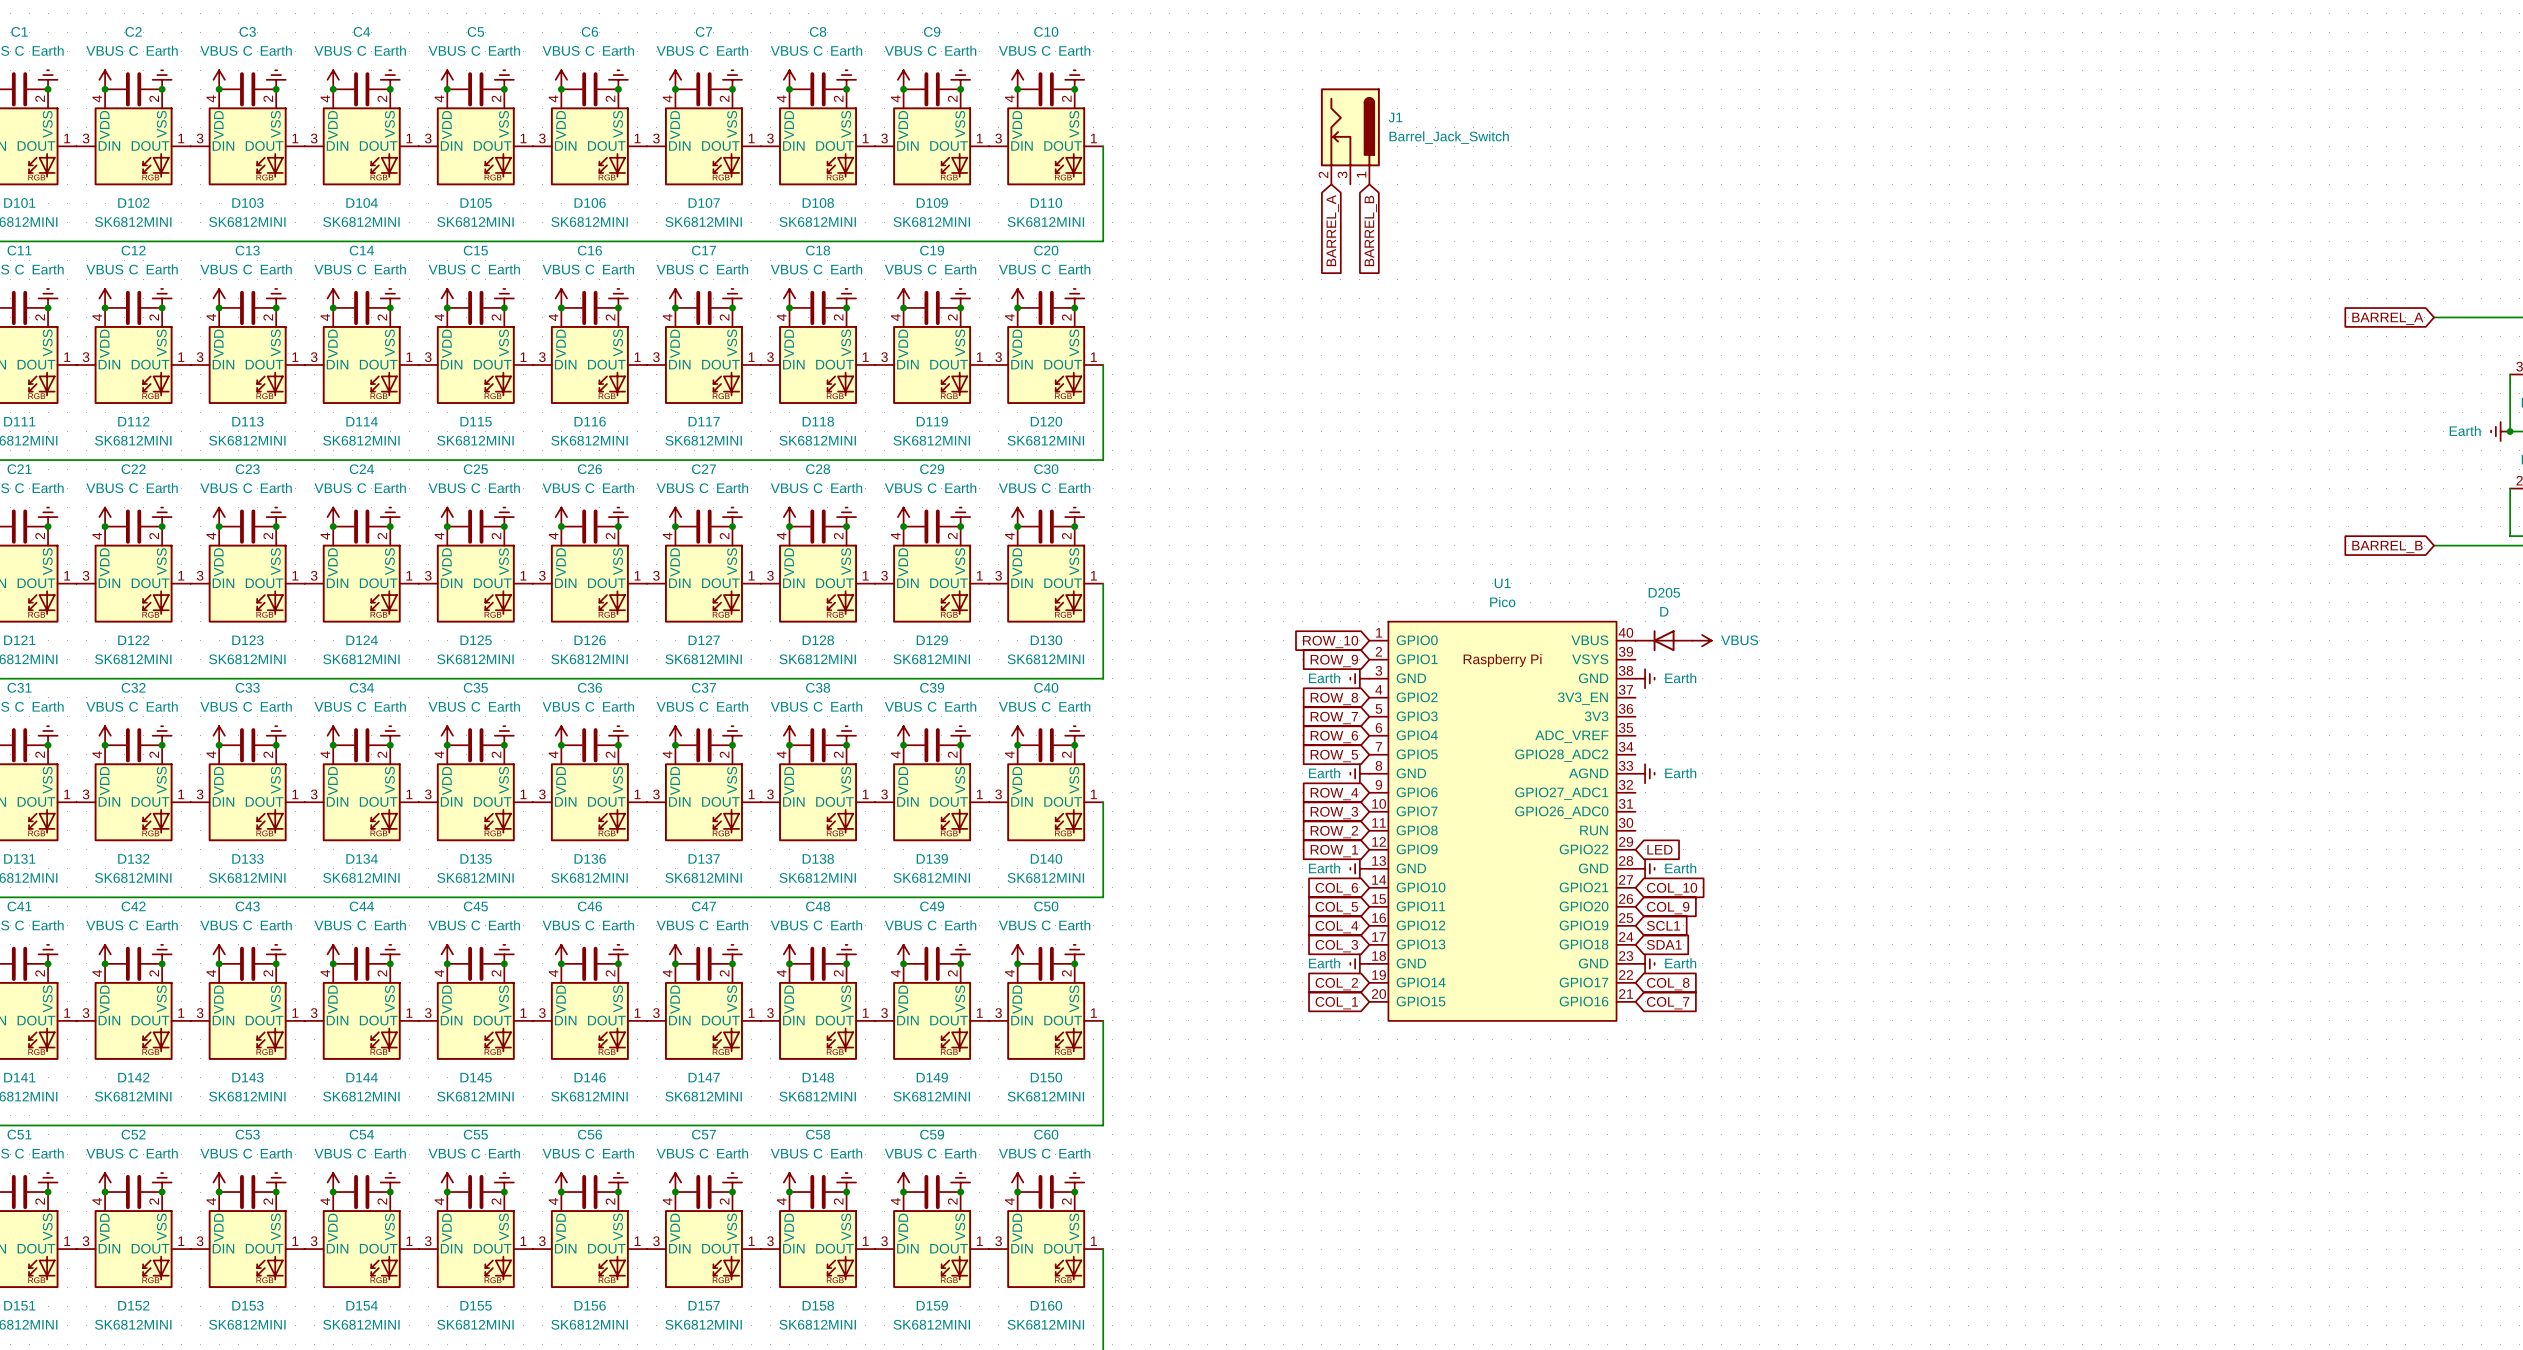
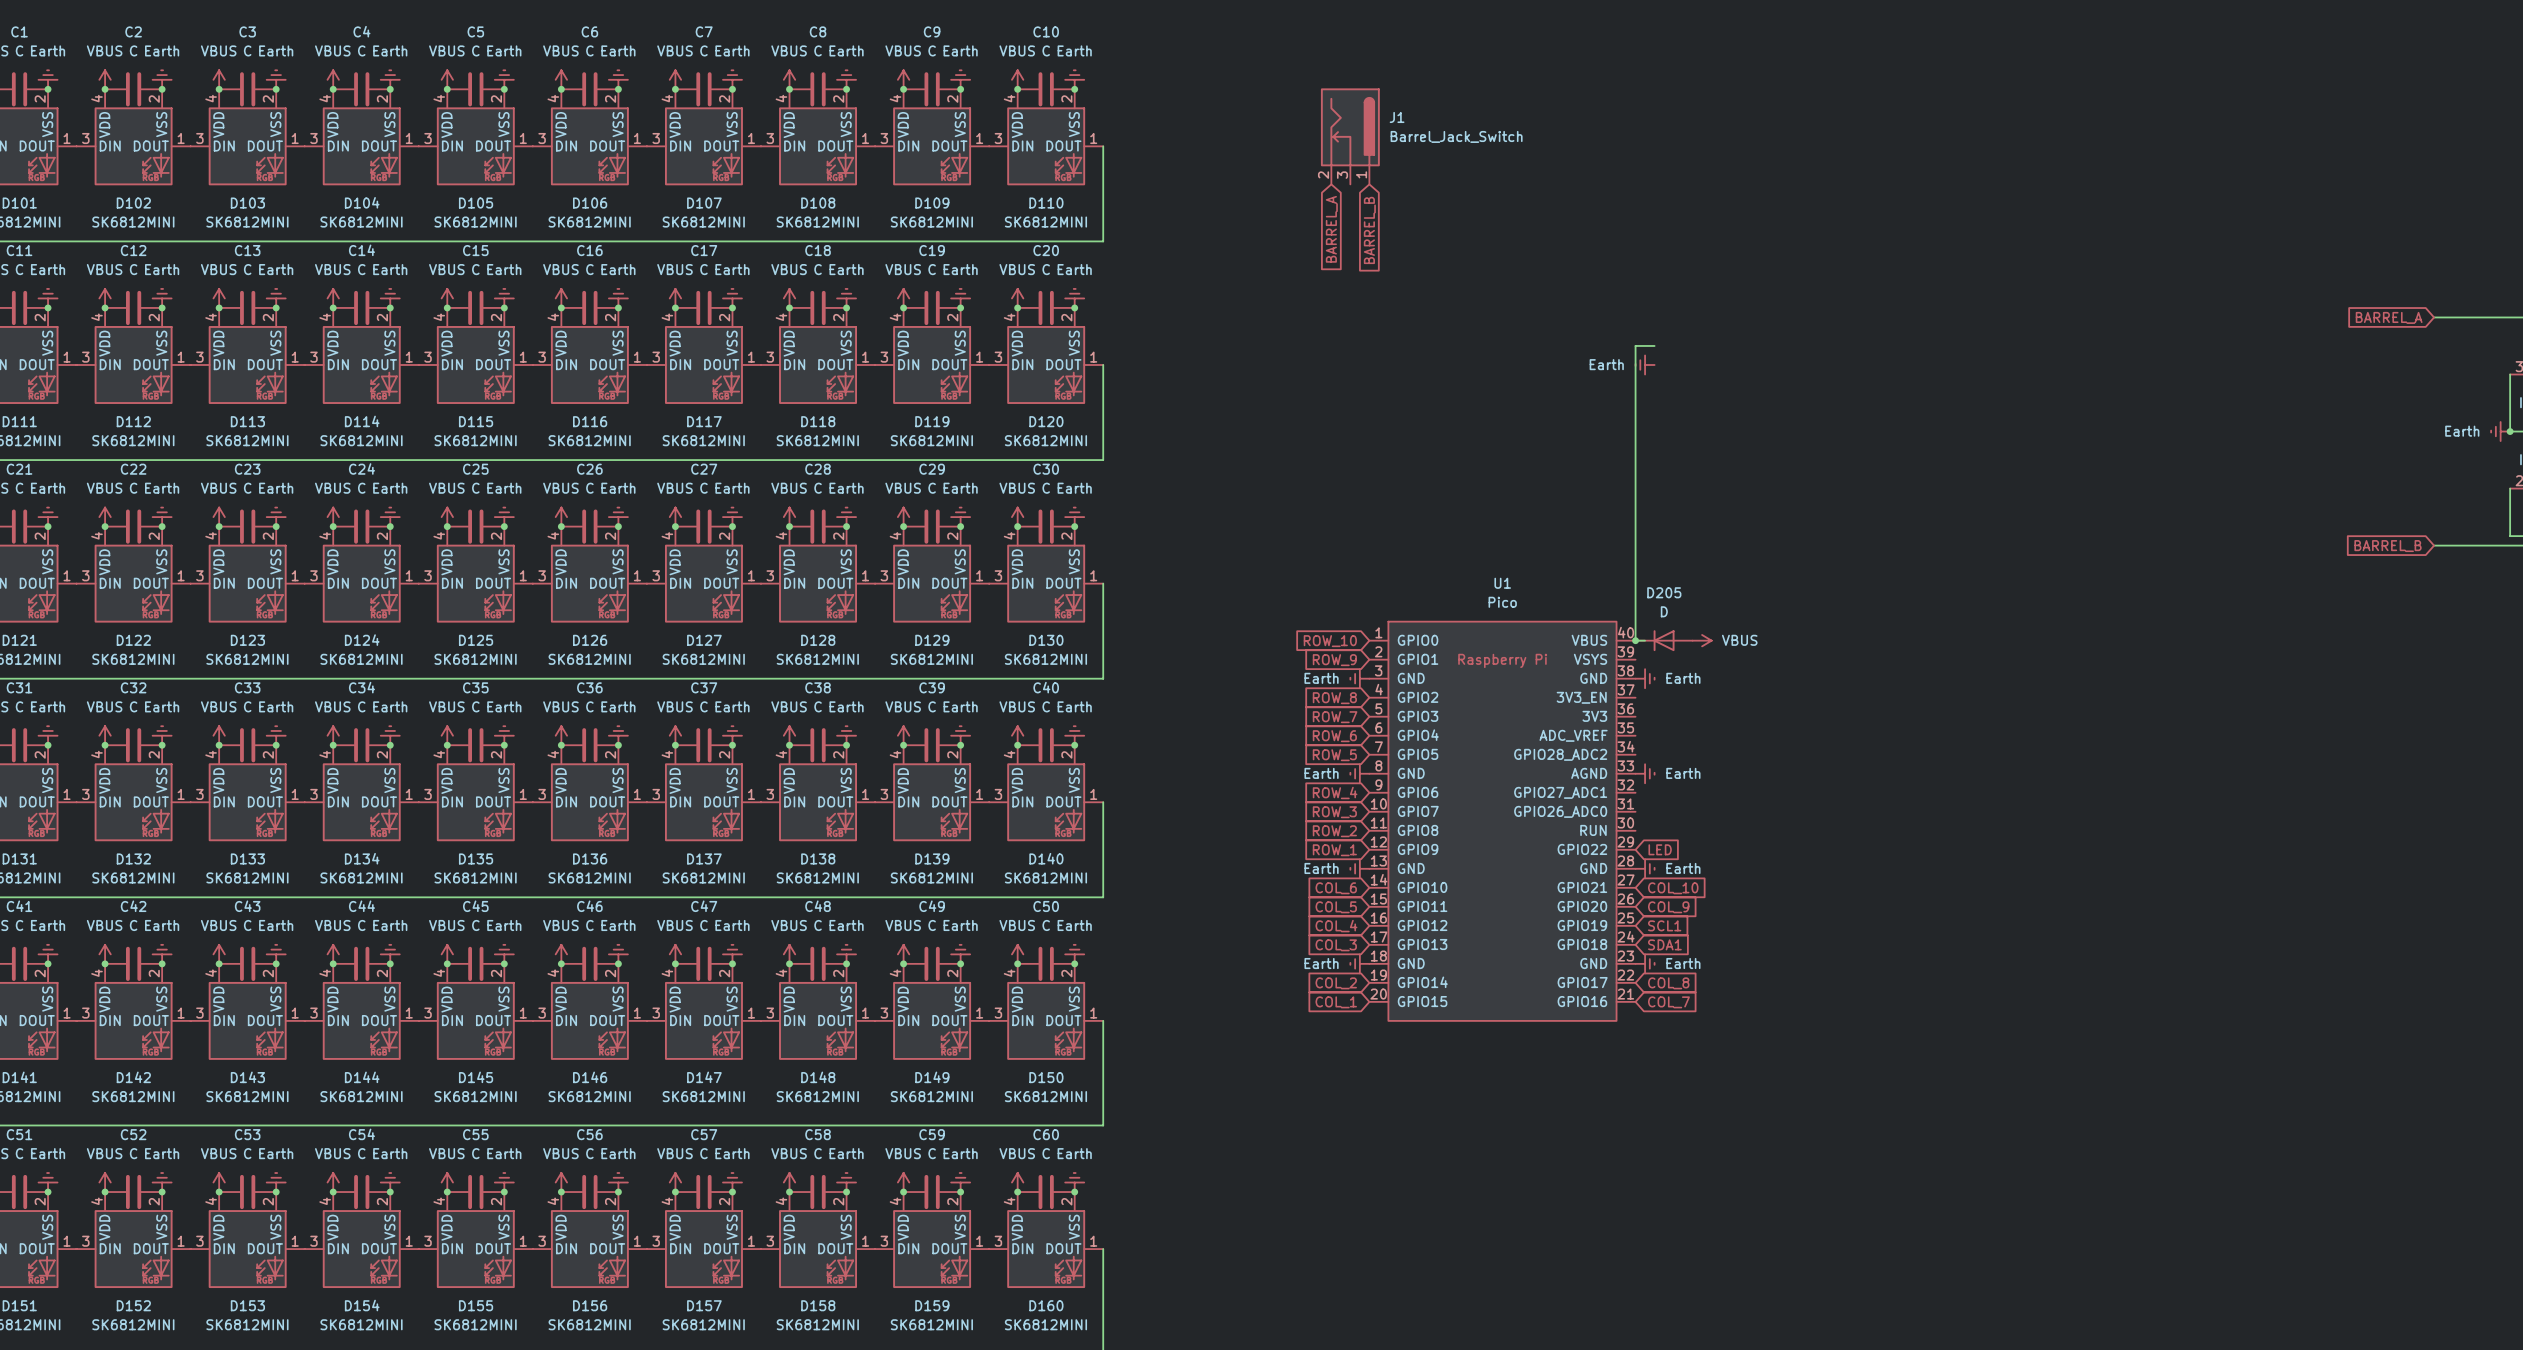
wire: none -> (1654, 345) (1635, 345) (1635, 640) (1645, 640)
power symbol: none -> Earth (1645, 364)
junction: none -> (1635, 640)

